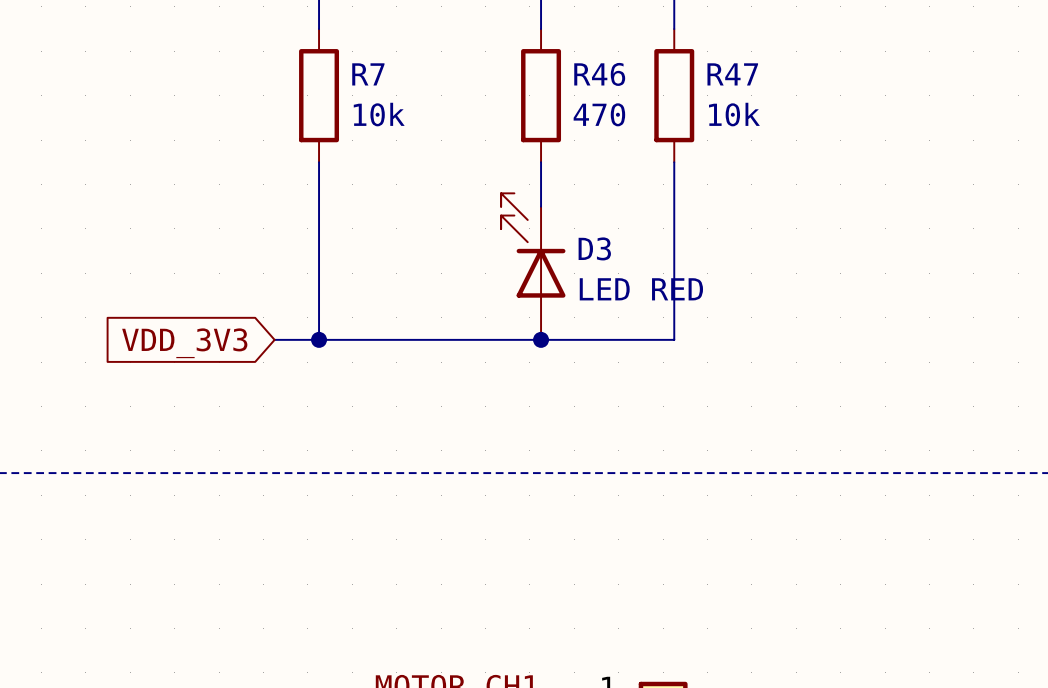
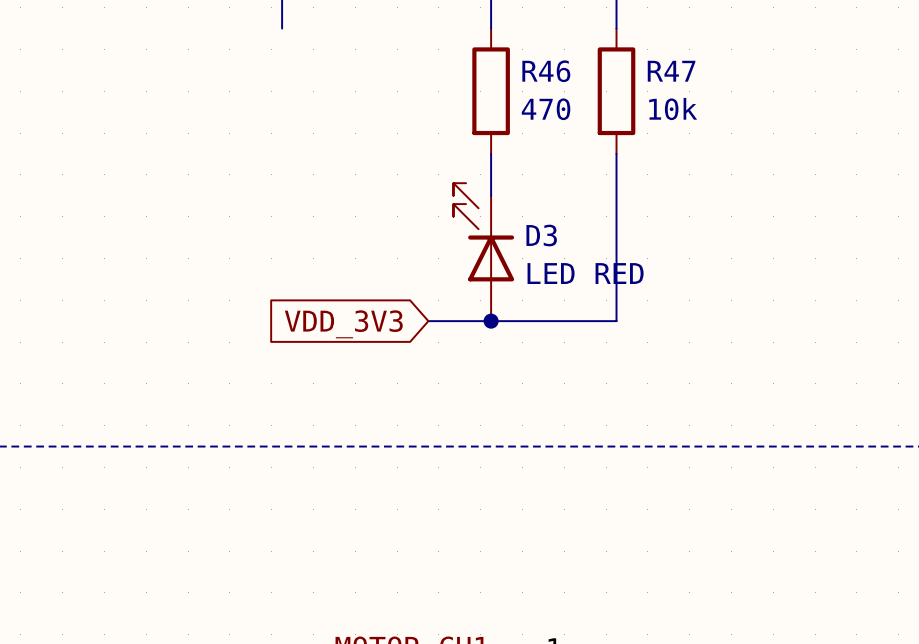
R7: 10k (319, 95) -> none
wire: (319, 162) (319, 339) -> none
wire: (274, 339) (474, 339) -> none
junction: (319, 339) -> none
global label position: VDD_3V3 (184, 343) -> VDD_3V3 (343, 324)

